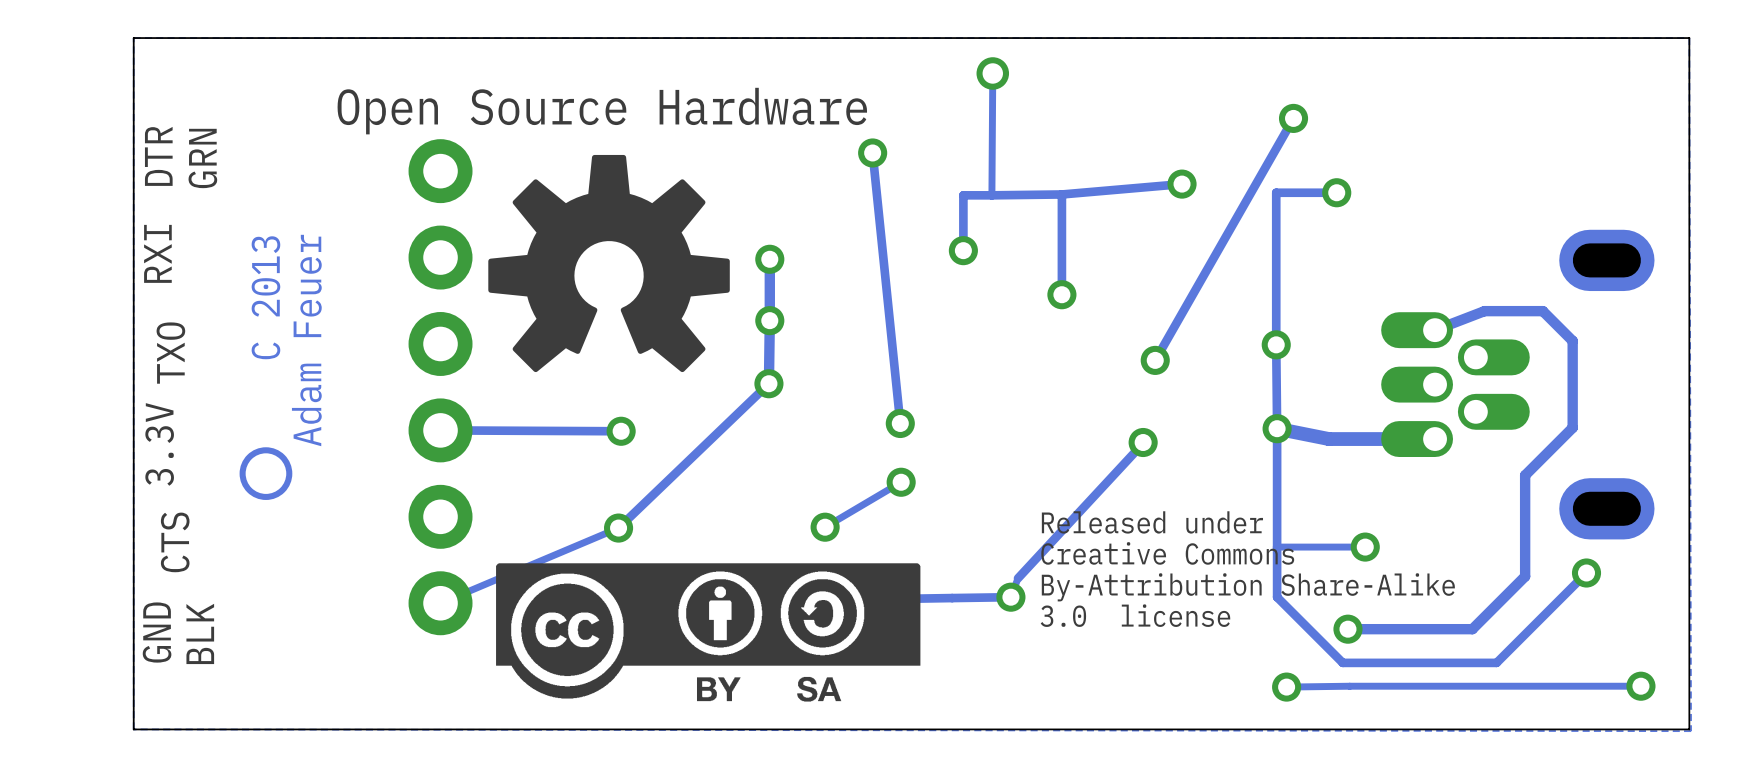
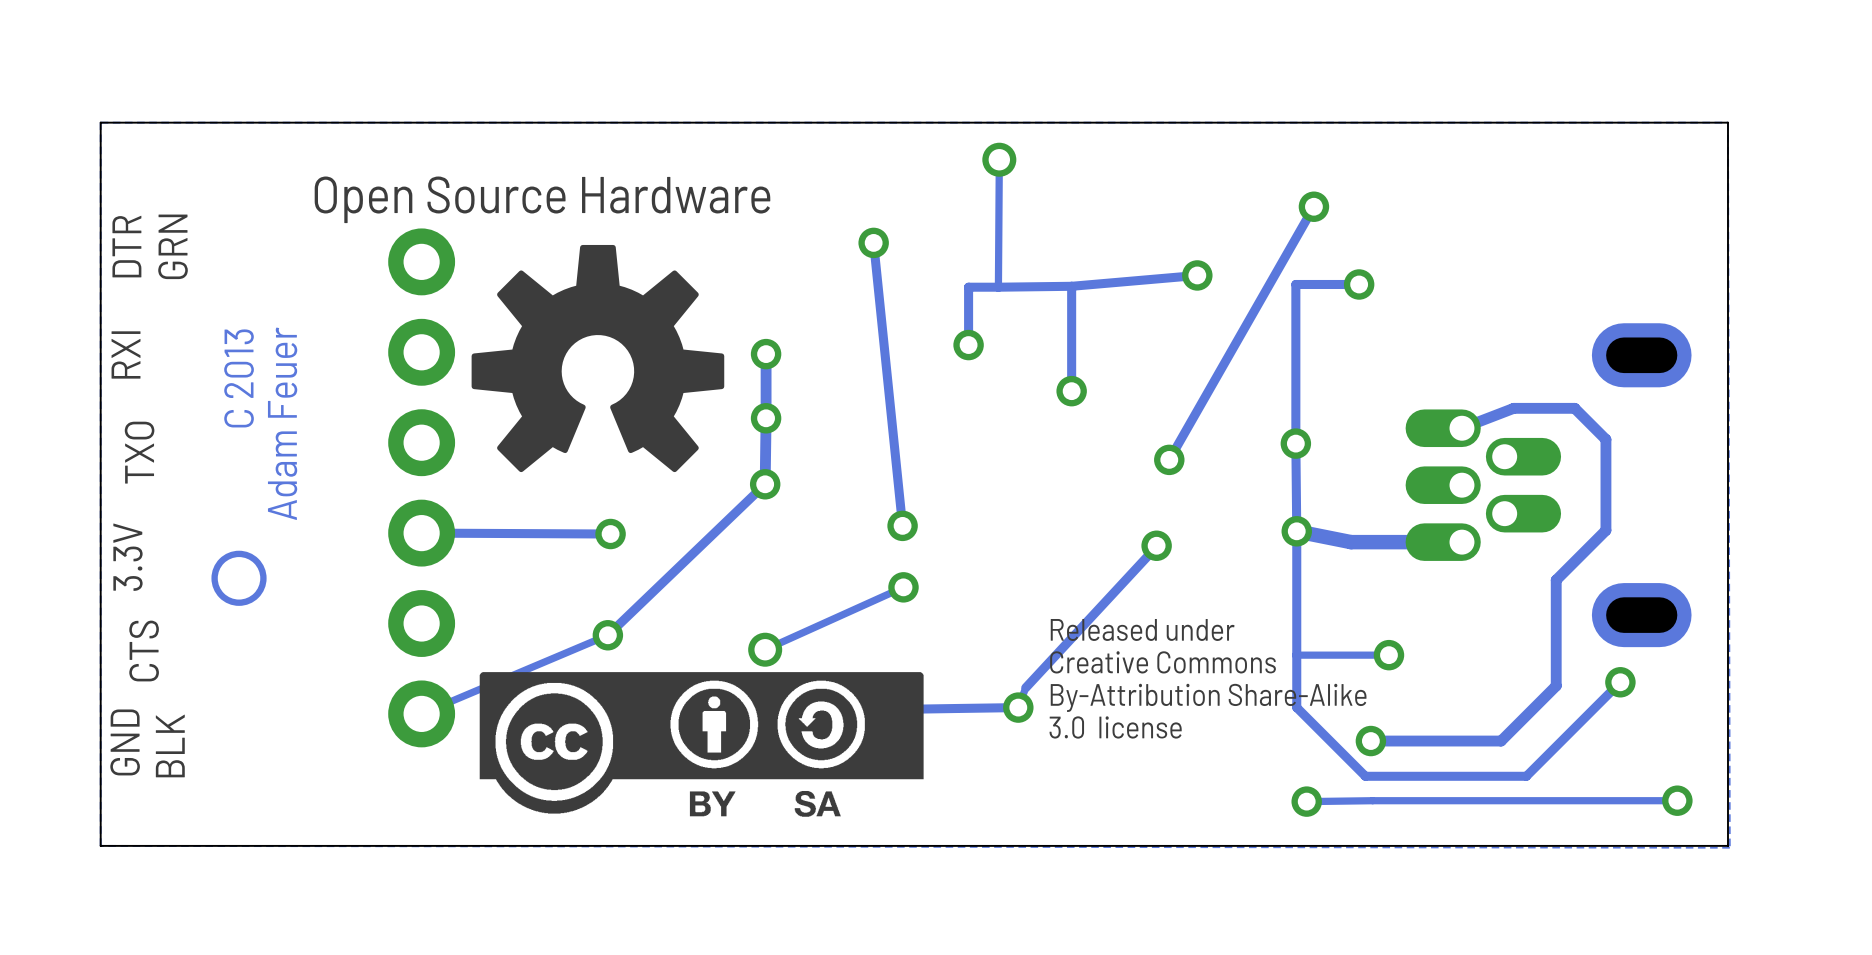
track: (901, 482) (825, 527) -> (903, 587) (765, 649)
via: (825, 527) -> none
via: none -> (765, 649)

